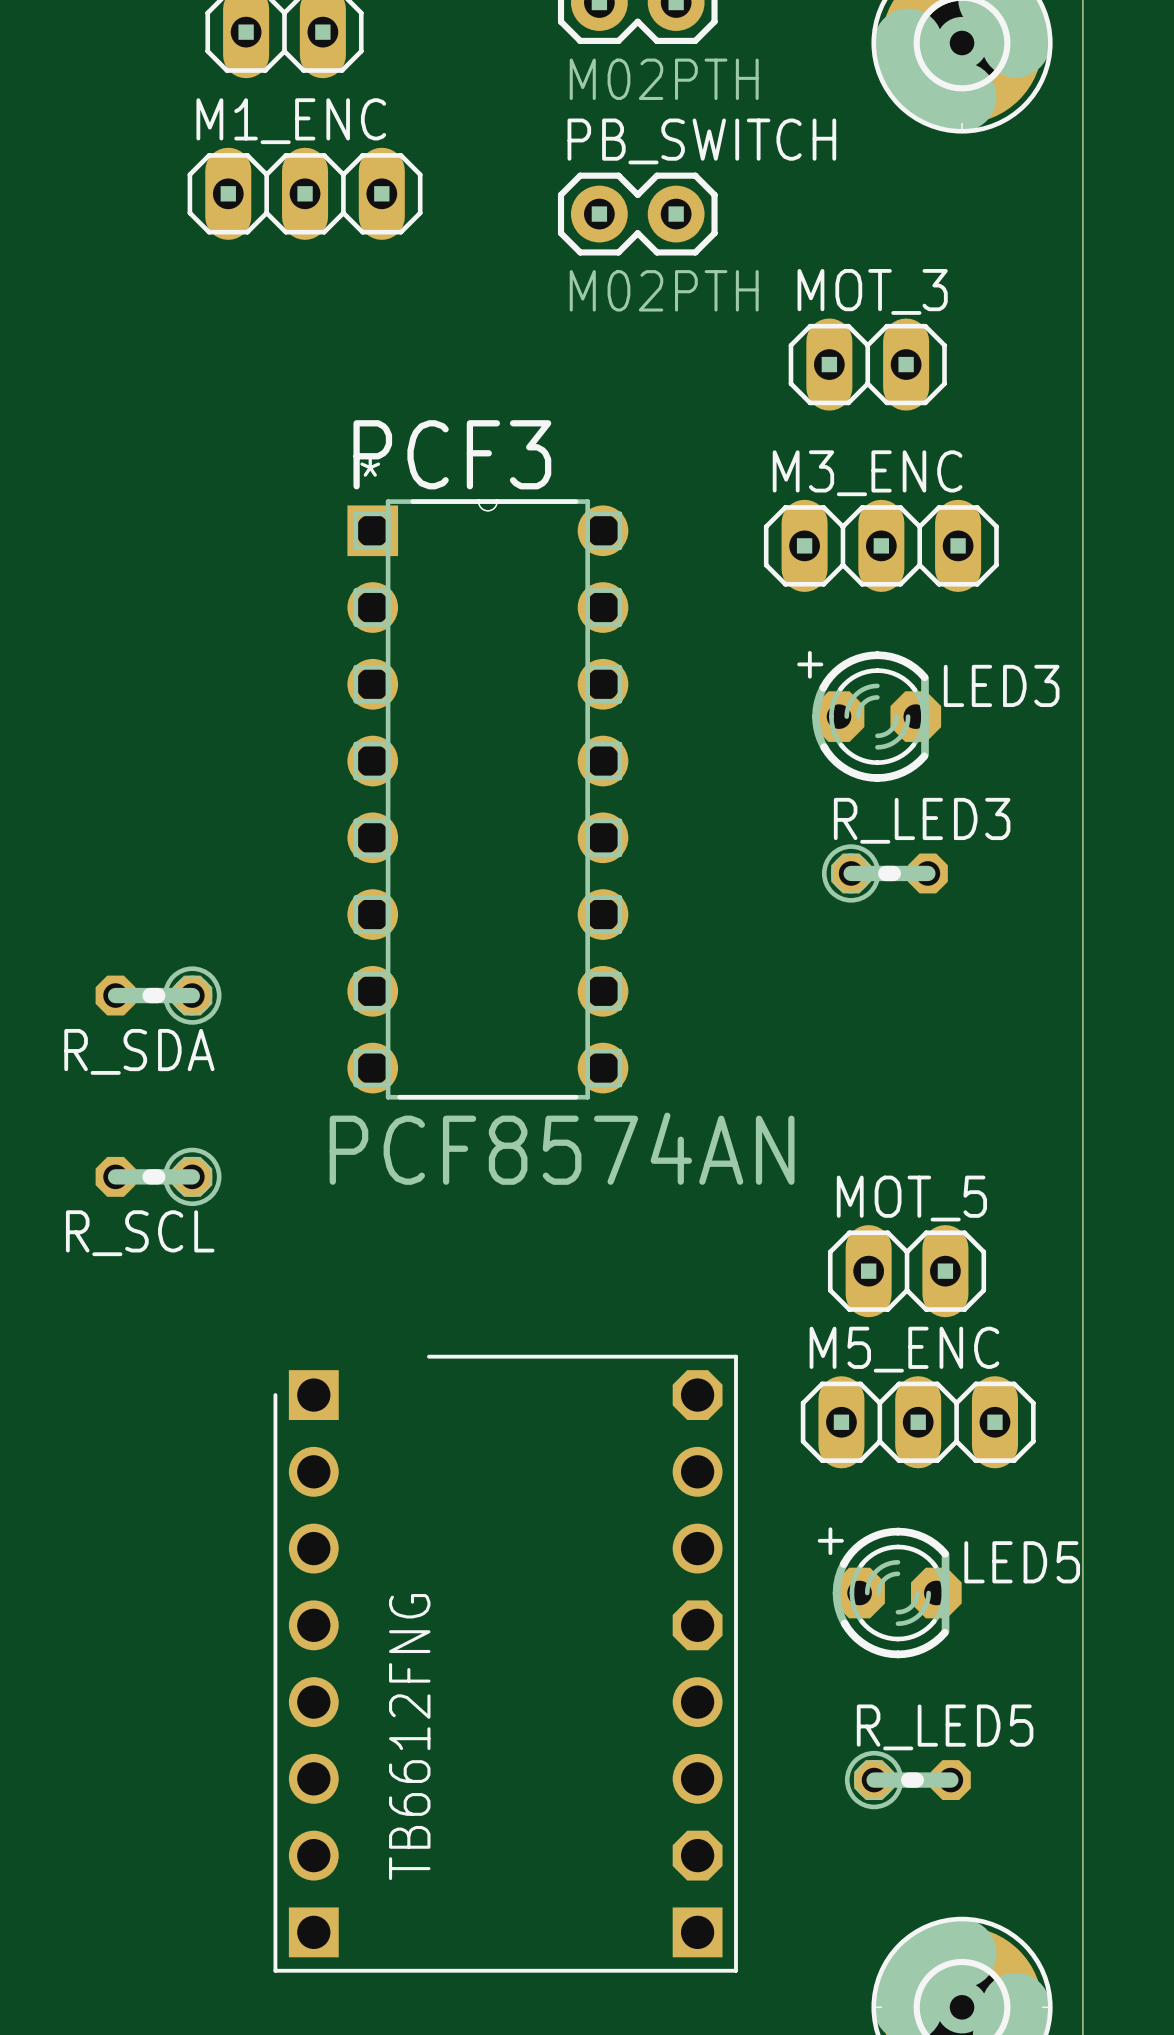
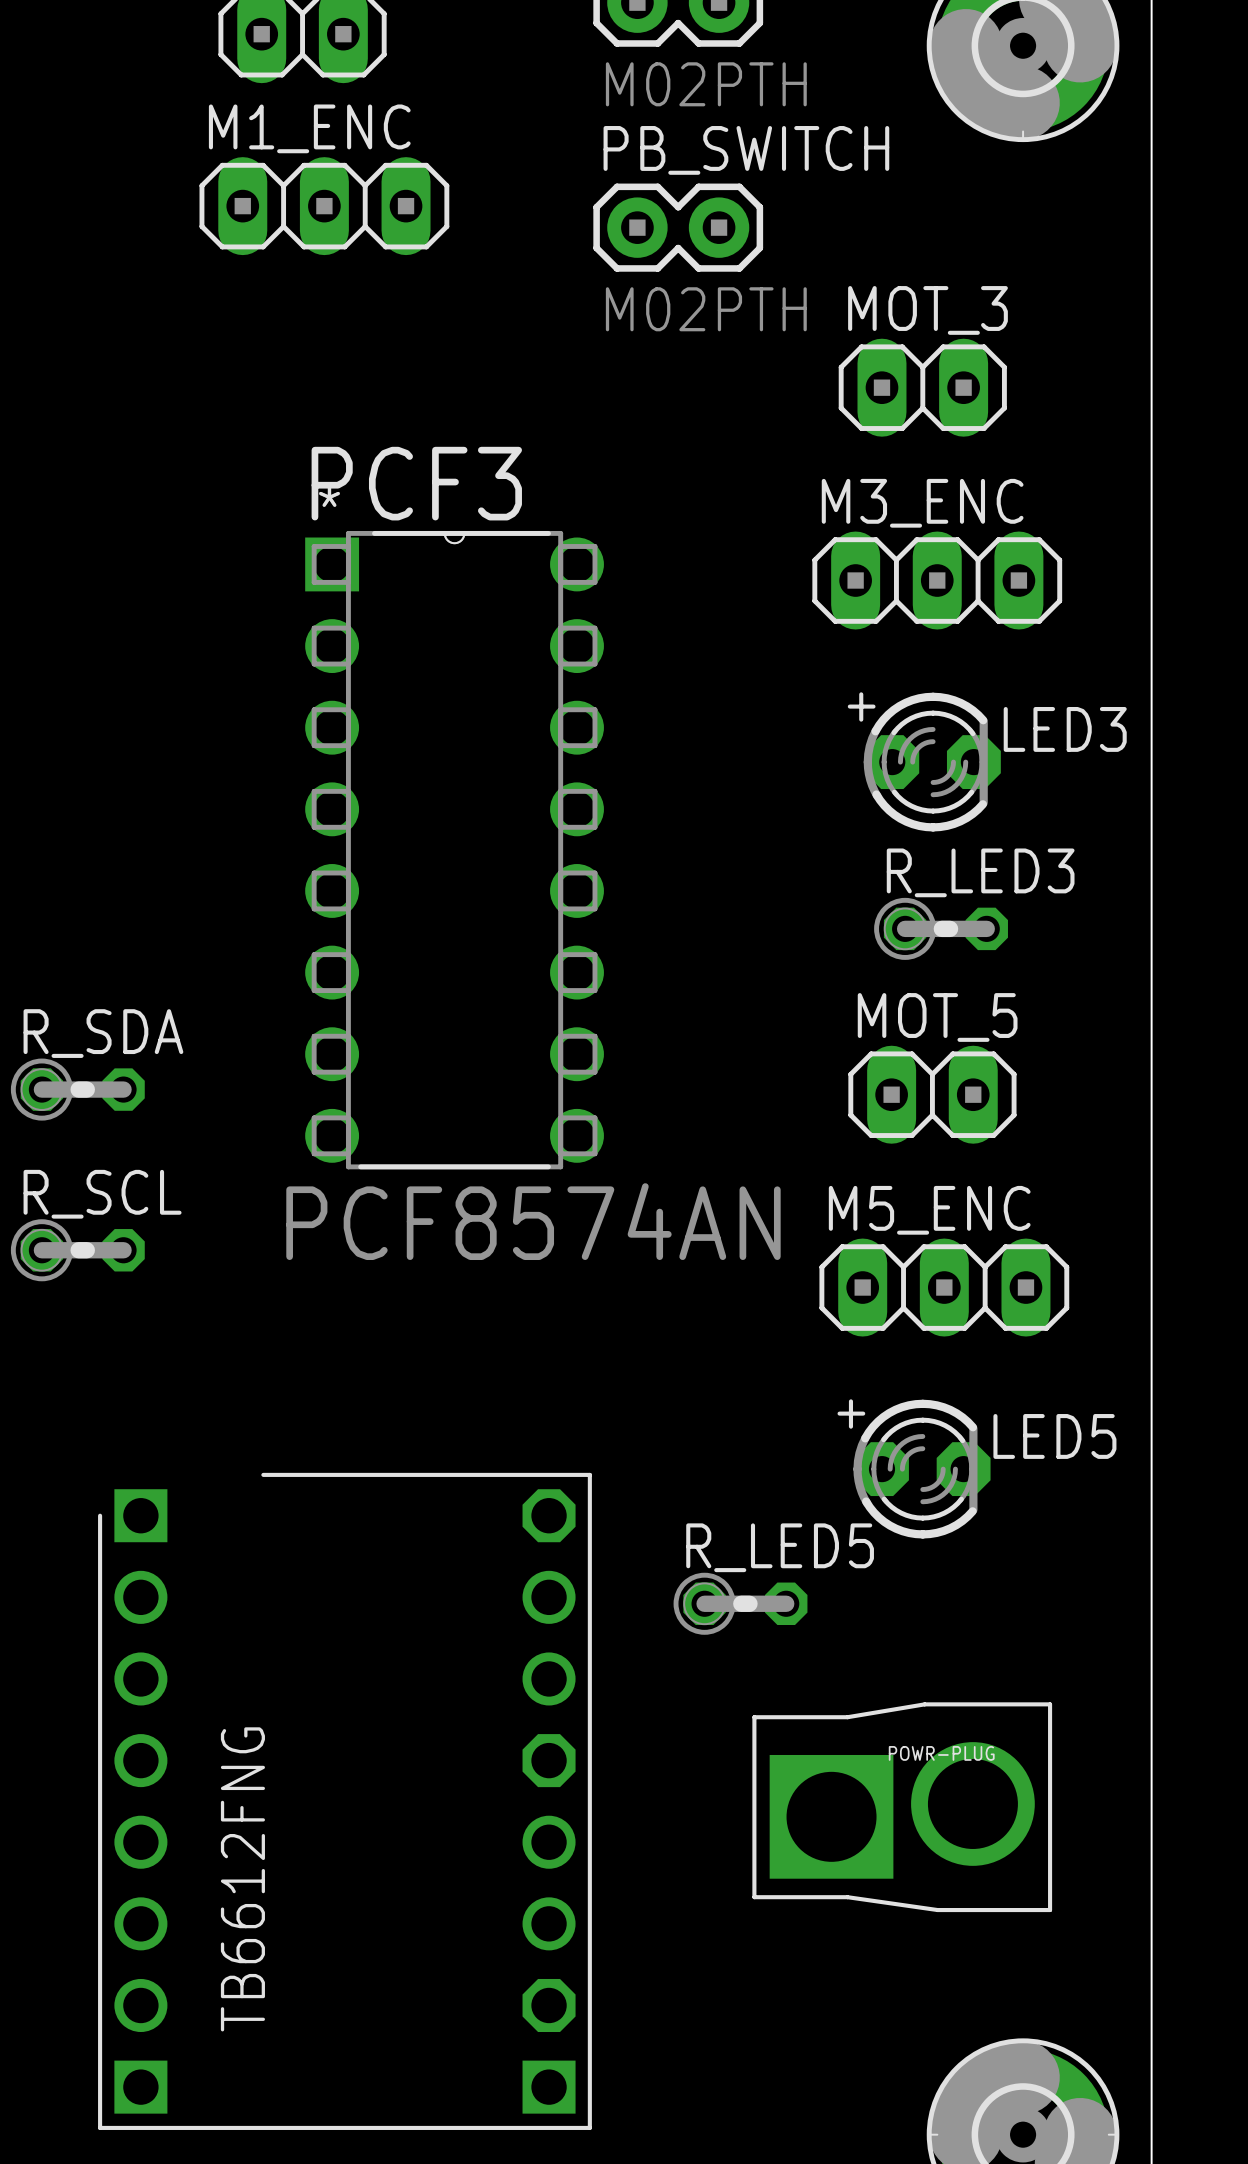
PCF3 position: (487, 799) -> (454, 850)
R_SDA rotation: 0° (158, 995) -> 180° (77, 1089)
R_SDA position: (158, 995) -> (77, 1089)
R_SCL rotation: 0° (158, 1176) -> 180° (77, 1250)
R_SCL position: (158, 1176) -> (77, 1250)
MOT_5 position: (907, 1271) -> (932, 1094)
M5_ENC position: (918, 1422) -> (944, 1287)
LED5 position: (889, 1592) -> (914, 1468)
part position: (505, 1663) -> (344, 1801)
POWR-PLUG: none -> (902, 1807)
R_LED5 position: (907, 1780) -> (740, 1603)

